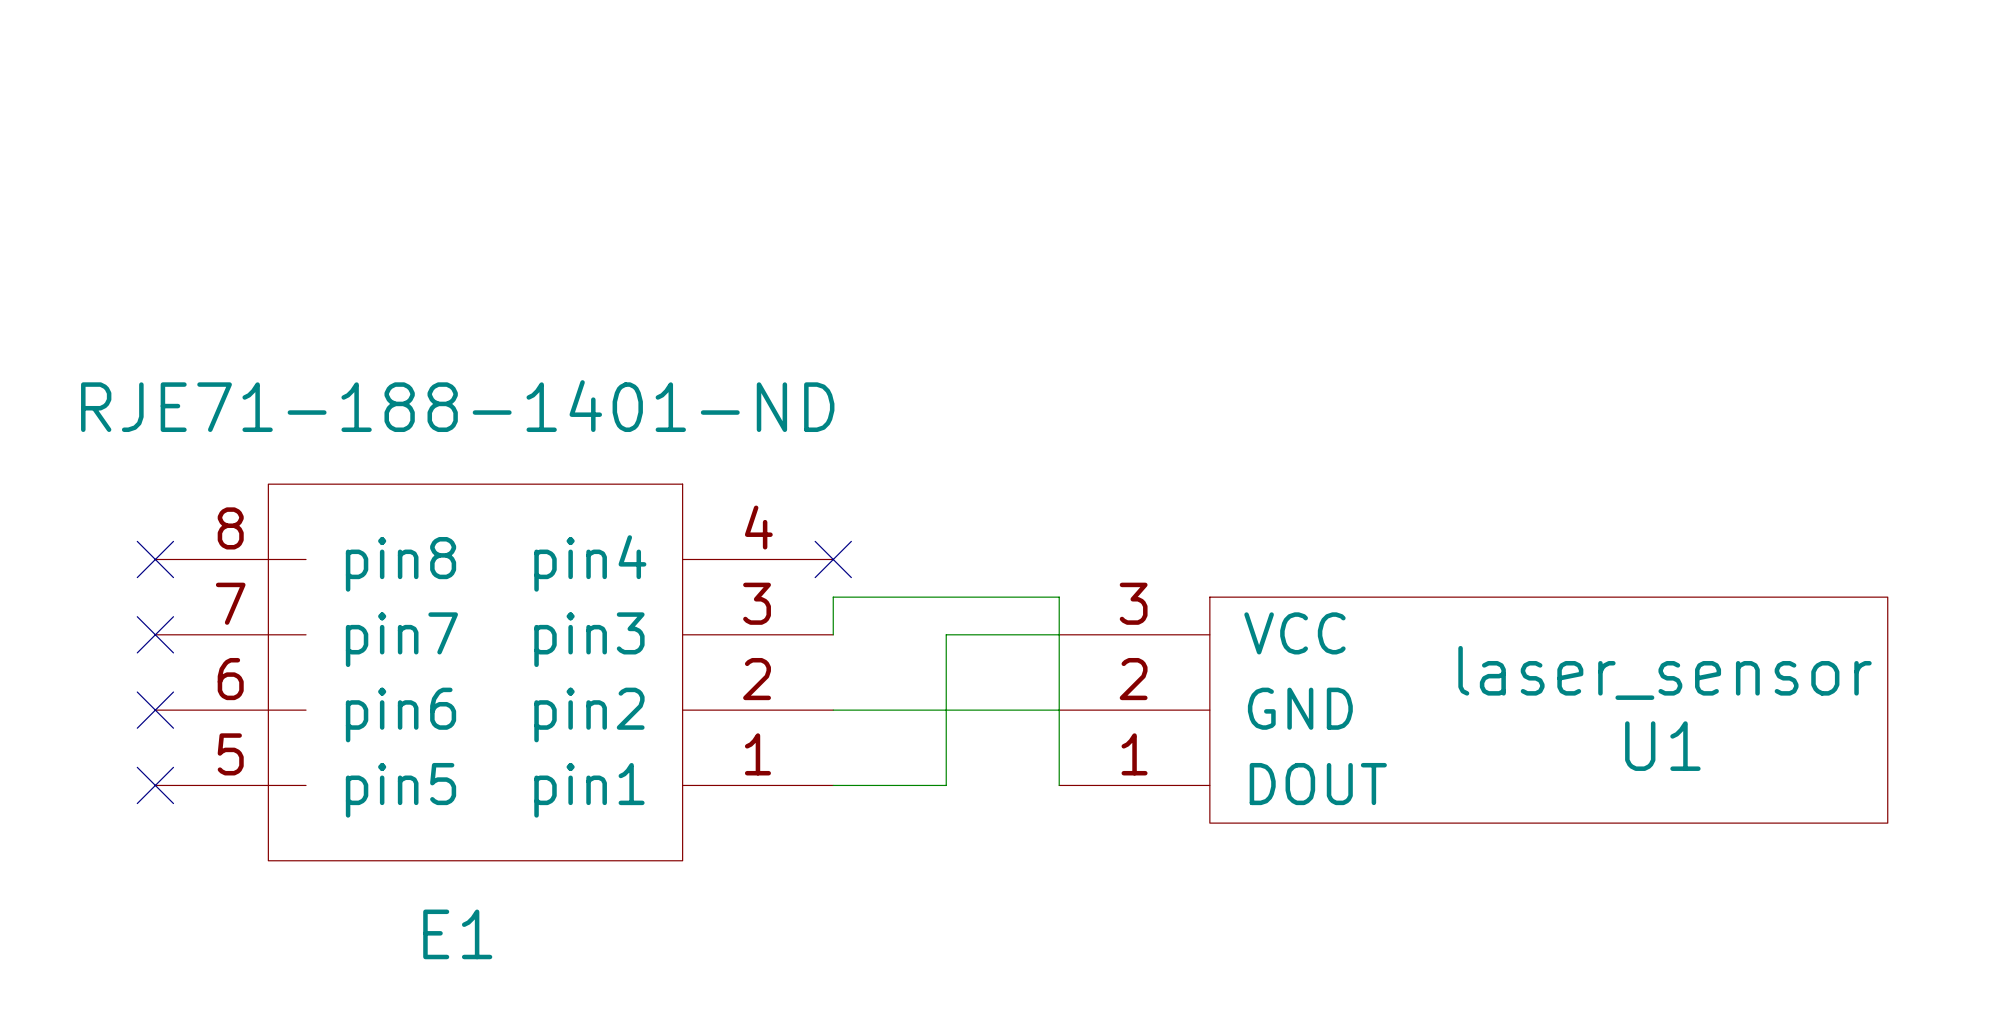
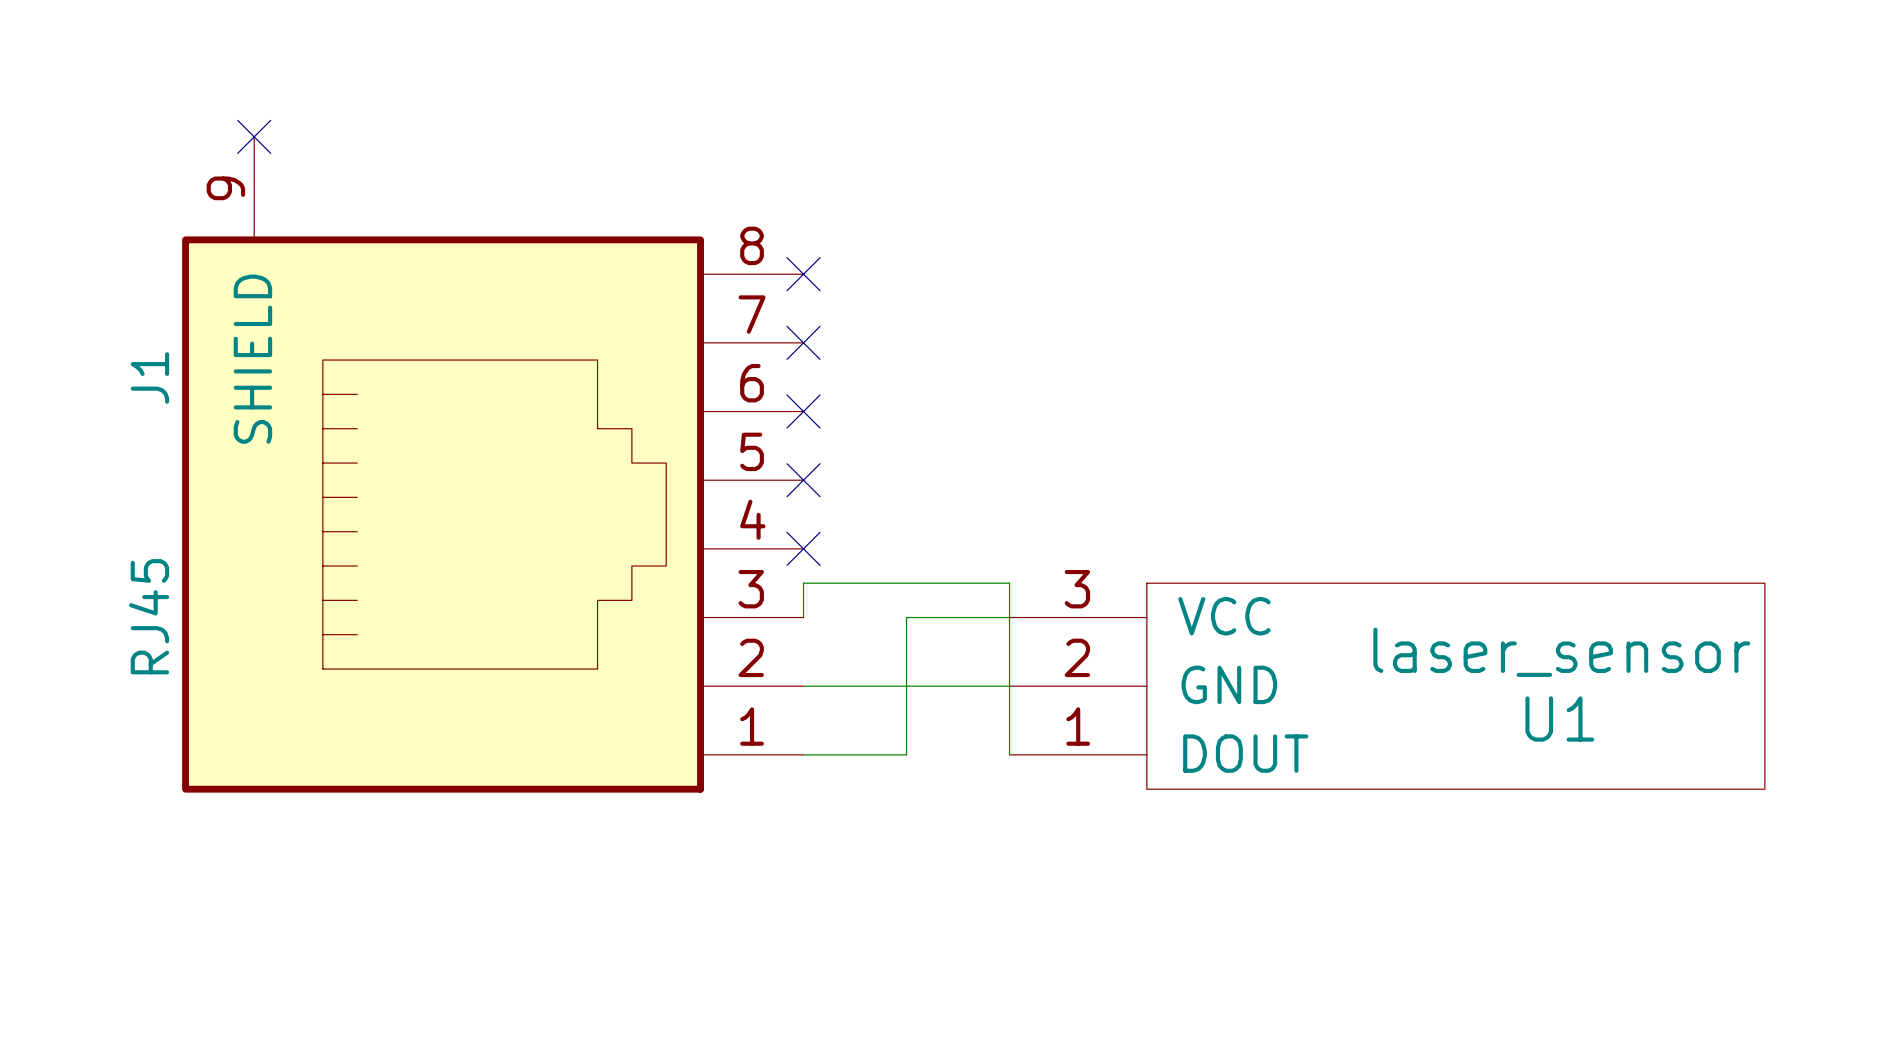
no-connect mark: none -> (254, 136)
no-connect mark: none -> (803, 274)
no-connect mark: none -> (803, 342)
no-connect mark: none -> (803, 411)
J1: none -> RJ45 (492, 464)
no-connect mark: none -> (803, 480)
no-connect mark: (155, 559) -> none
no-connect mark: (155, 634) -> none
E1: RJE71-188-1401-ND (494, 672) -> none
no-connect mark: (155, 710) -> none
no-connect mark: (155, 785) -> none

